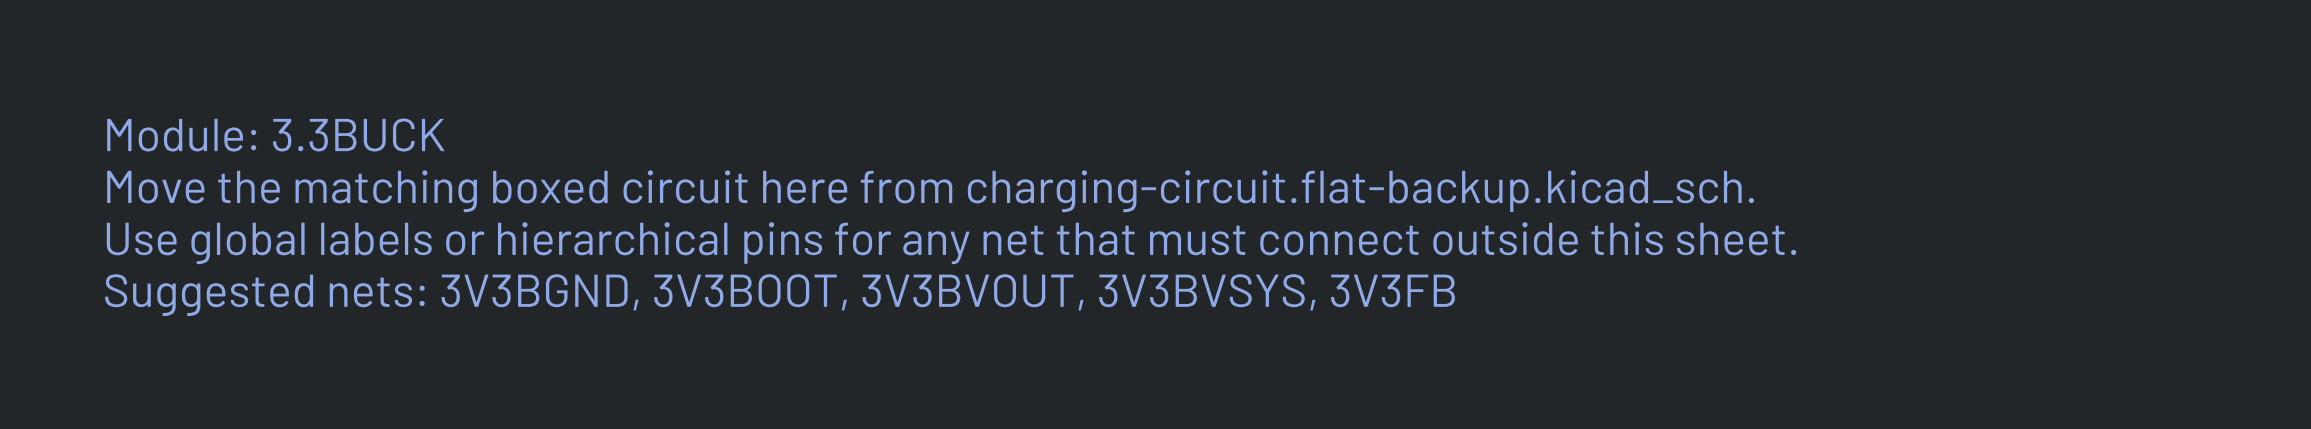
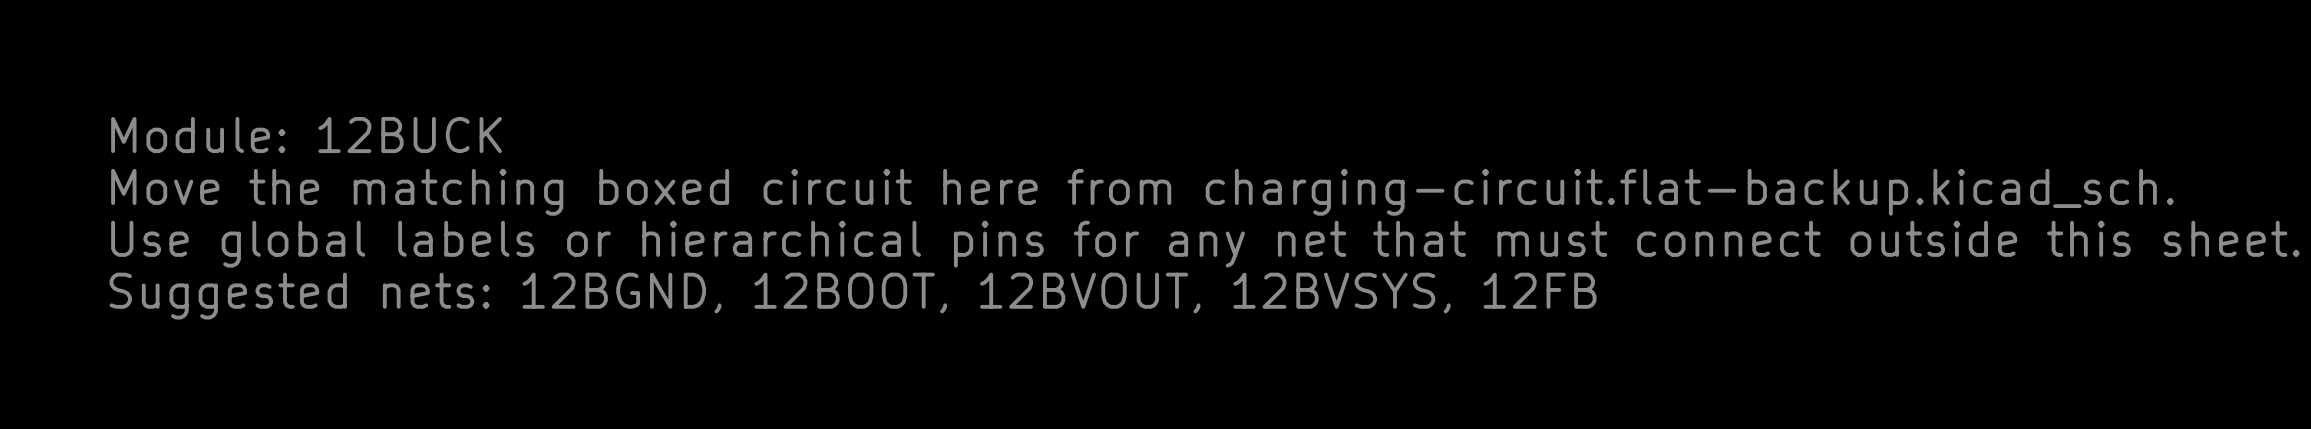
text: Module: 3.3BUCK (275, 135) -> Module: 12BUCK (306, 135)
text: Suggested nets: 3V3BGND, 3V3BOOT, 3V3BVOUT, 3V3BVSYS, 3V3FB (780, 295) -> Suggested nets: 12BGND, 12BOOT, 12BVOUT, 12BVSYS, 12FB (853, 296)

